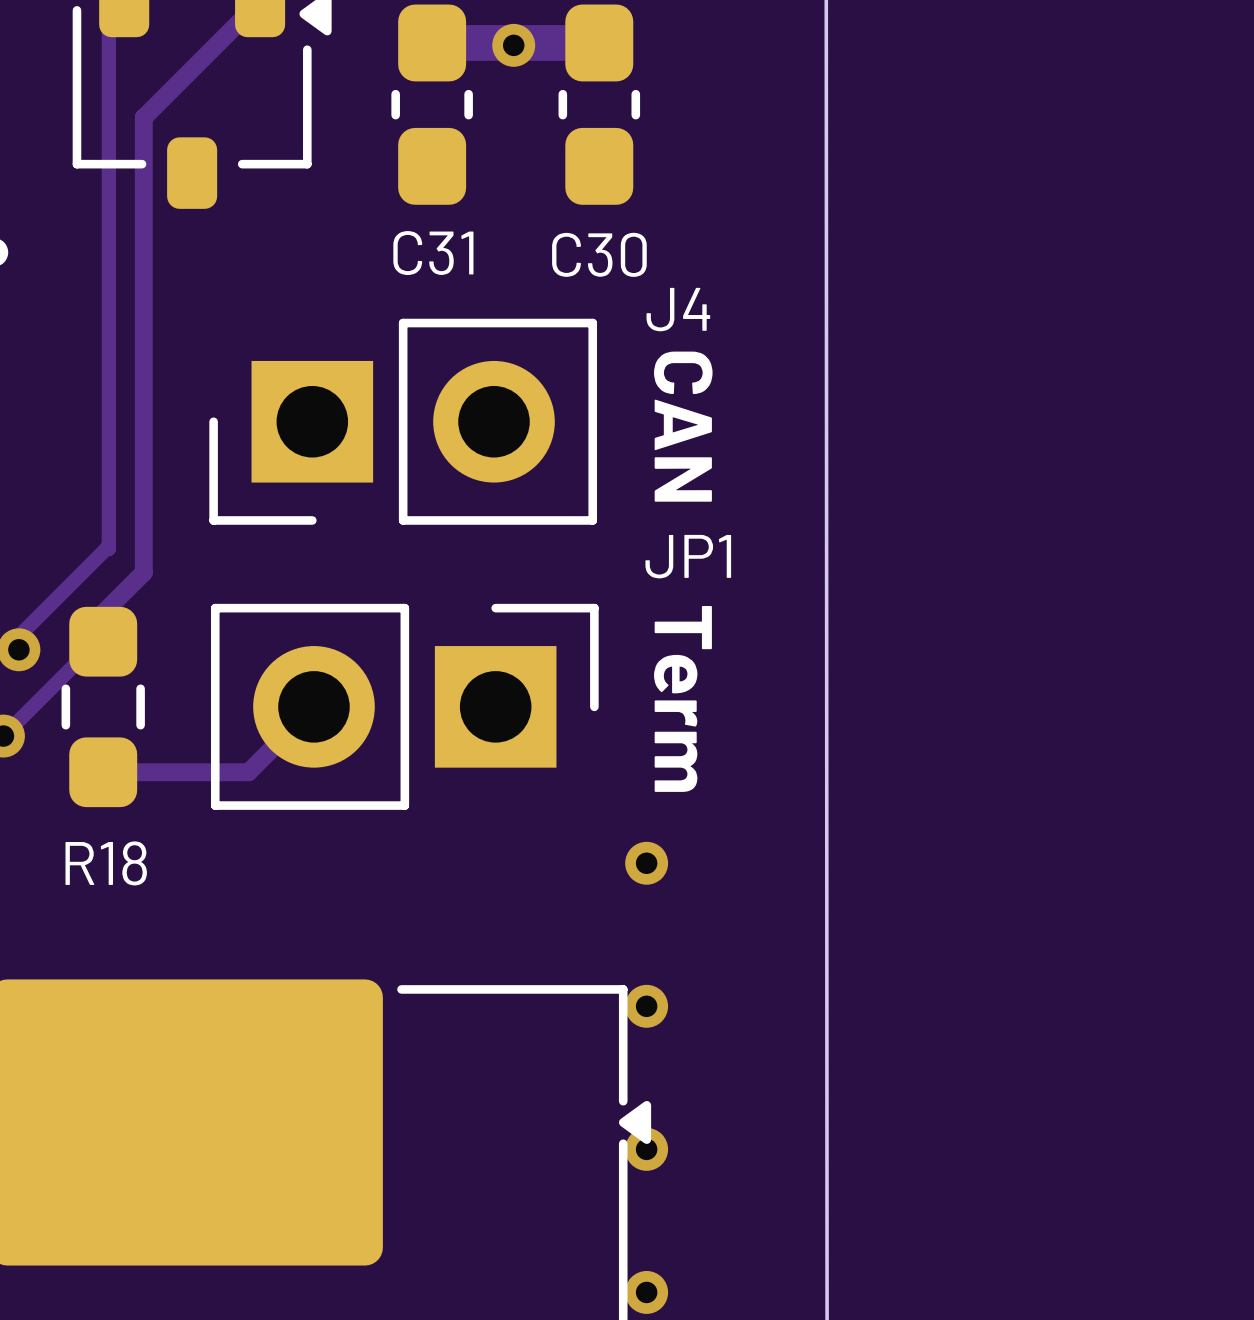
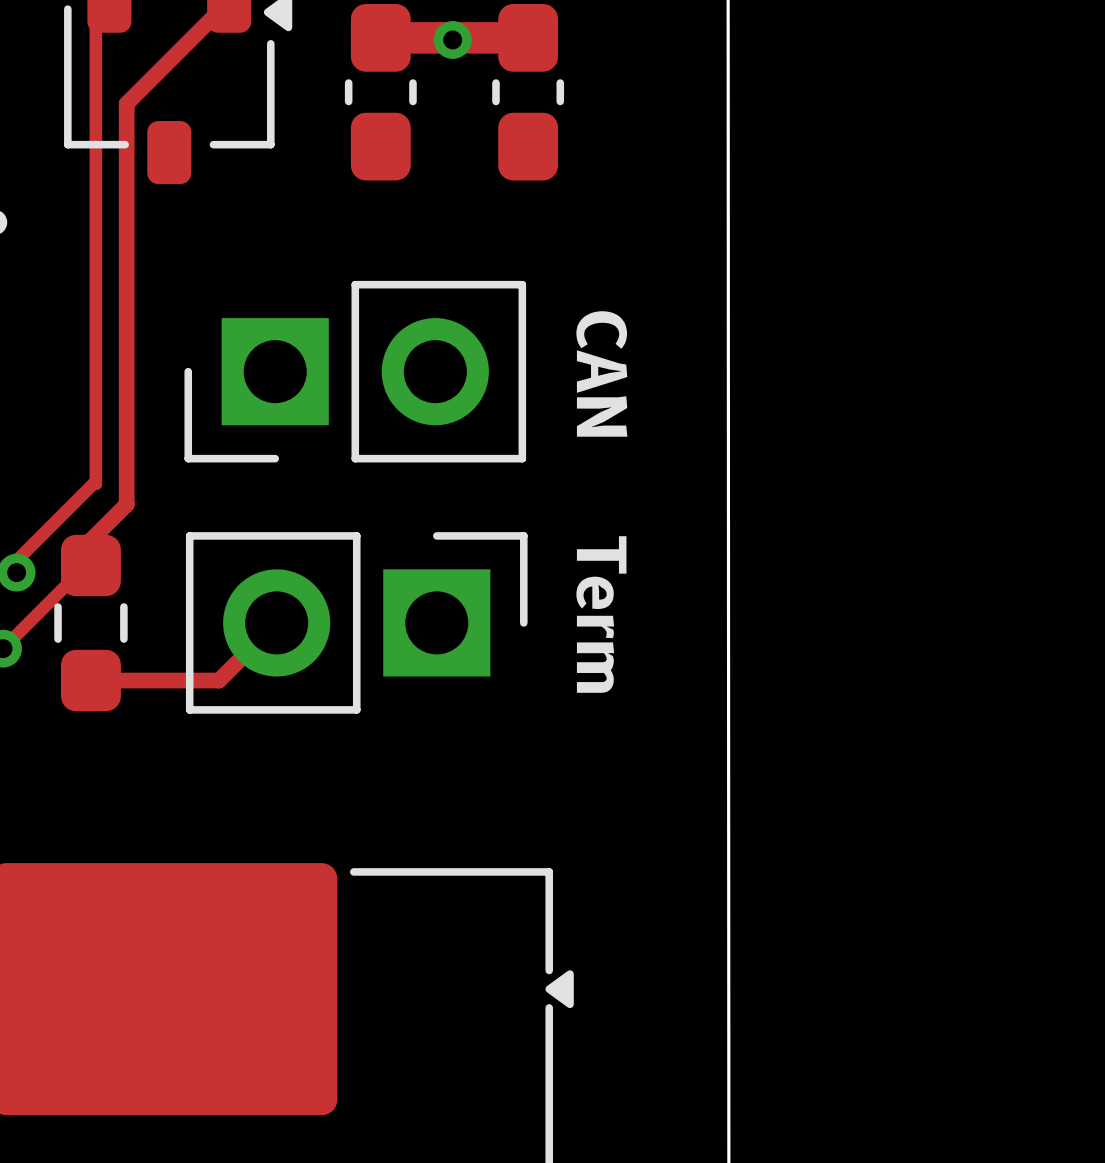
C31 name: C31 (433, 253) -> none
C30 name: C30 (599, 254) -> none
J4 name: J4 (678, 309) -> none
JP1 name: JP1 (688, 556) -> none
R18 name: R18 (106, 863) -> none
via: (646, 863) -> none
via: (646, 1006) -> none
via: (646, 1149) -> none
via: (646, 1292) -> none

